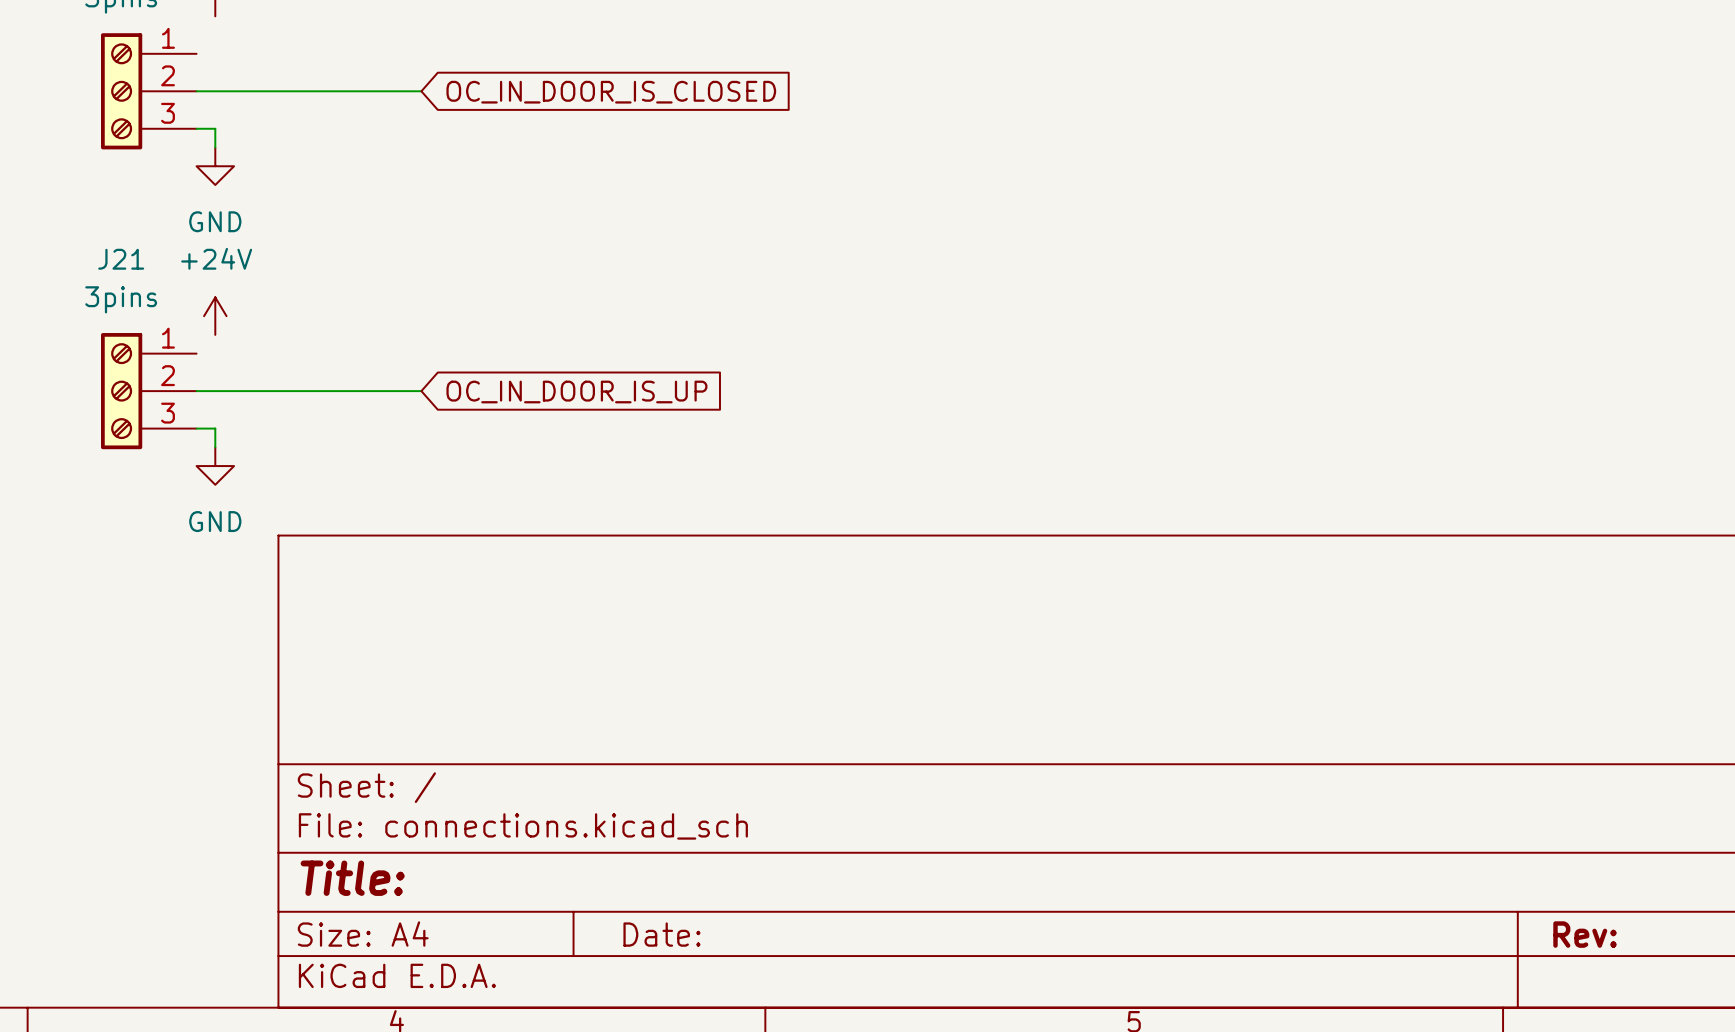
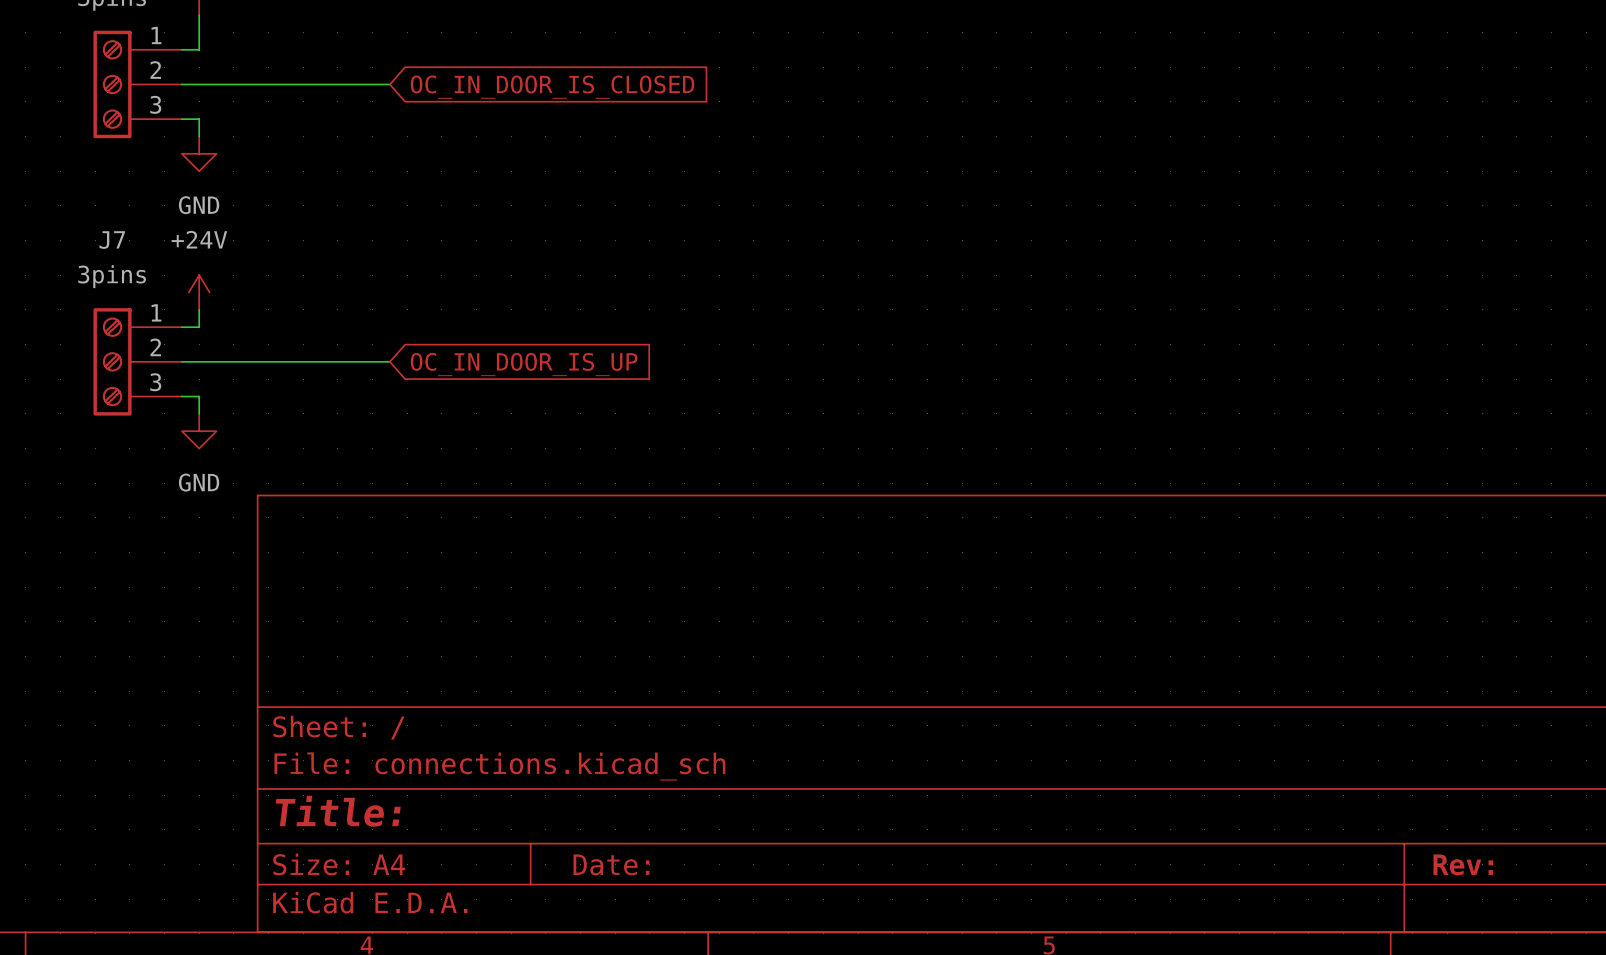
wire: none -> (199, 15) (199, 49) (181, 49)
J21 name: J21 (121, 259) -> J7 (112, 240)
wire: none -> (199, 309) (199, 327) (181, 327)

